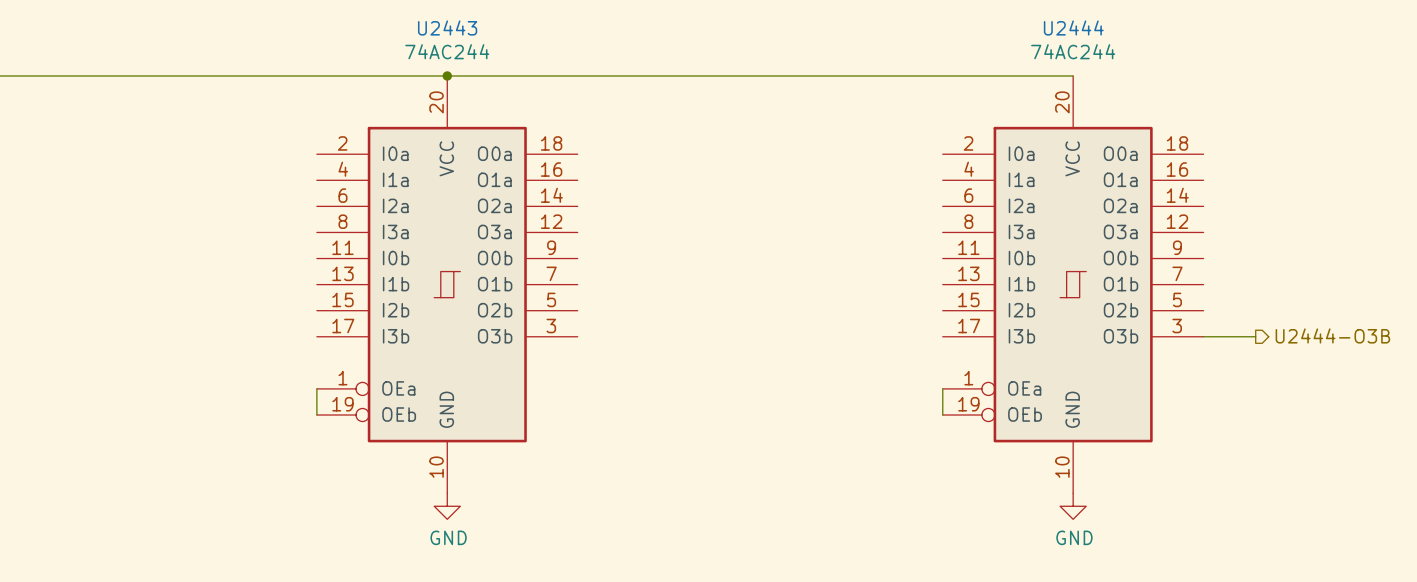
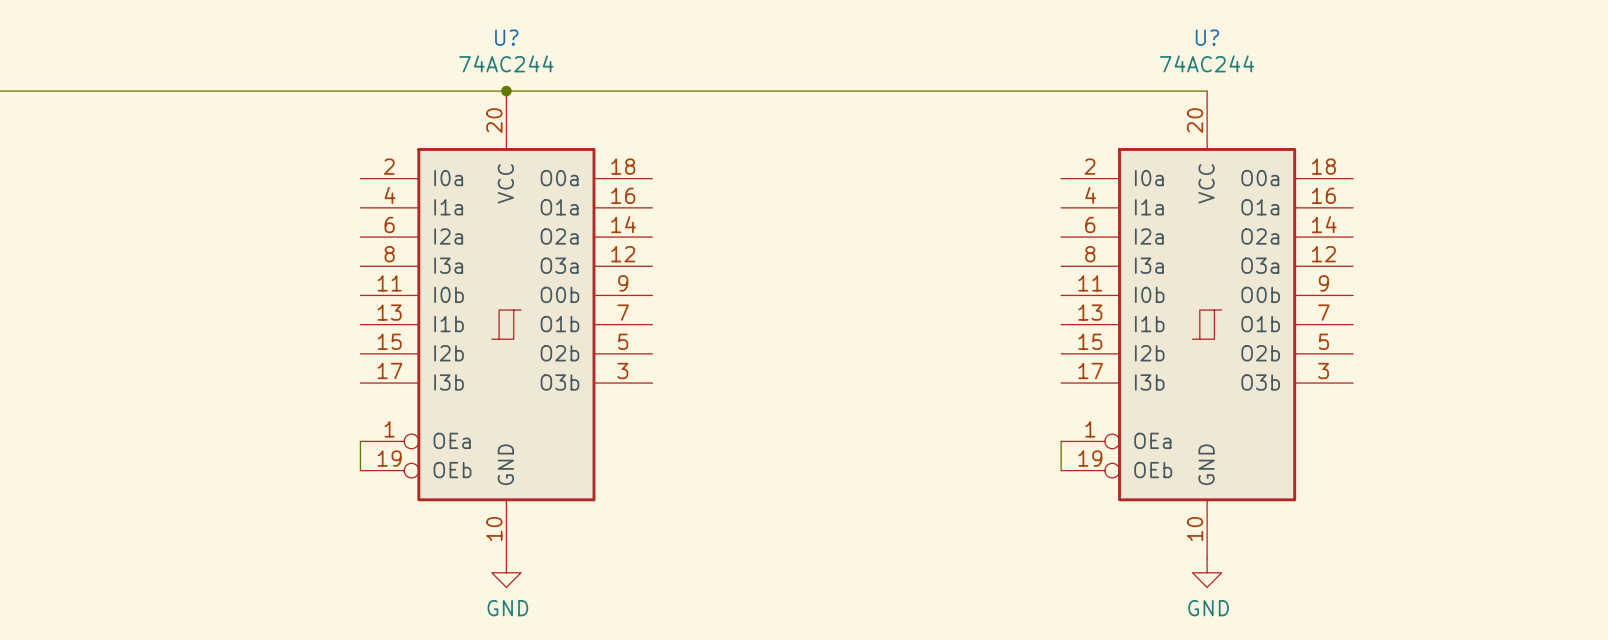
U2443 name: U2443 (447, 27) -> U? (506, 37)
U2444 name: U2444 (1073, 27) -> U? (1207, 37)
hierarchical label: U2444-O3B (1332, 335) -> none
wire: (1203, 336) (1255, 336) -> none

